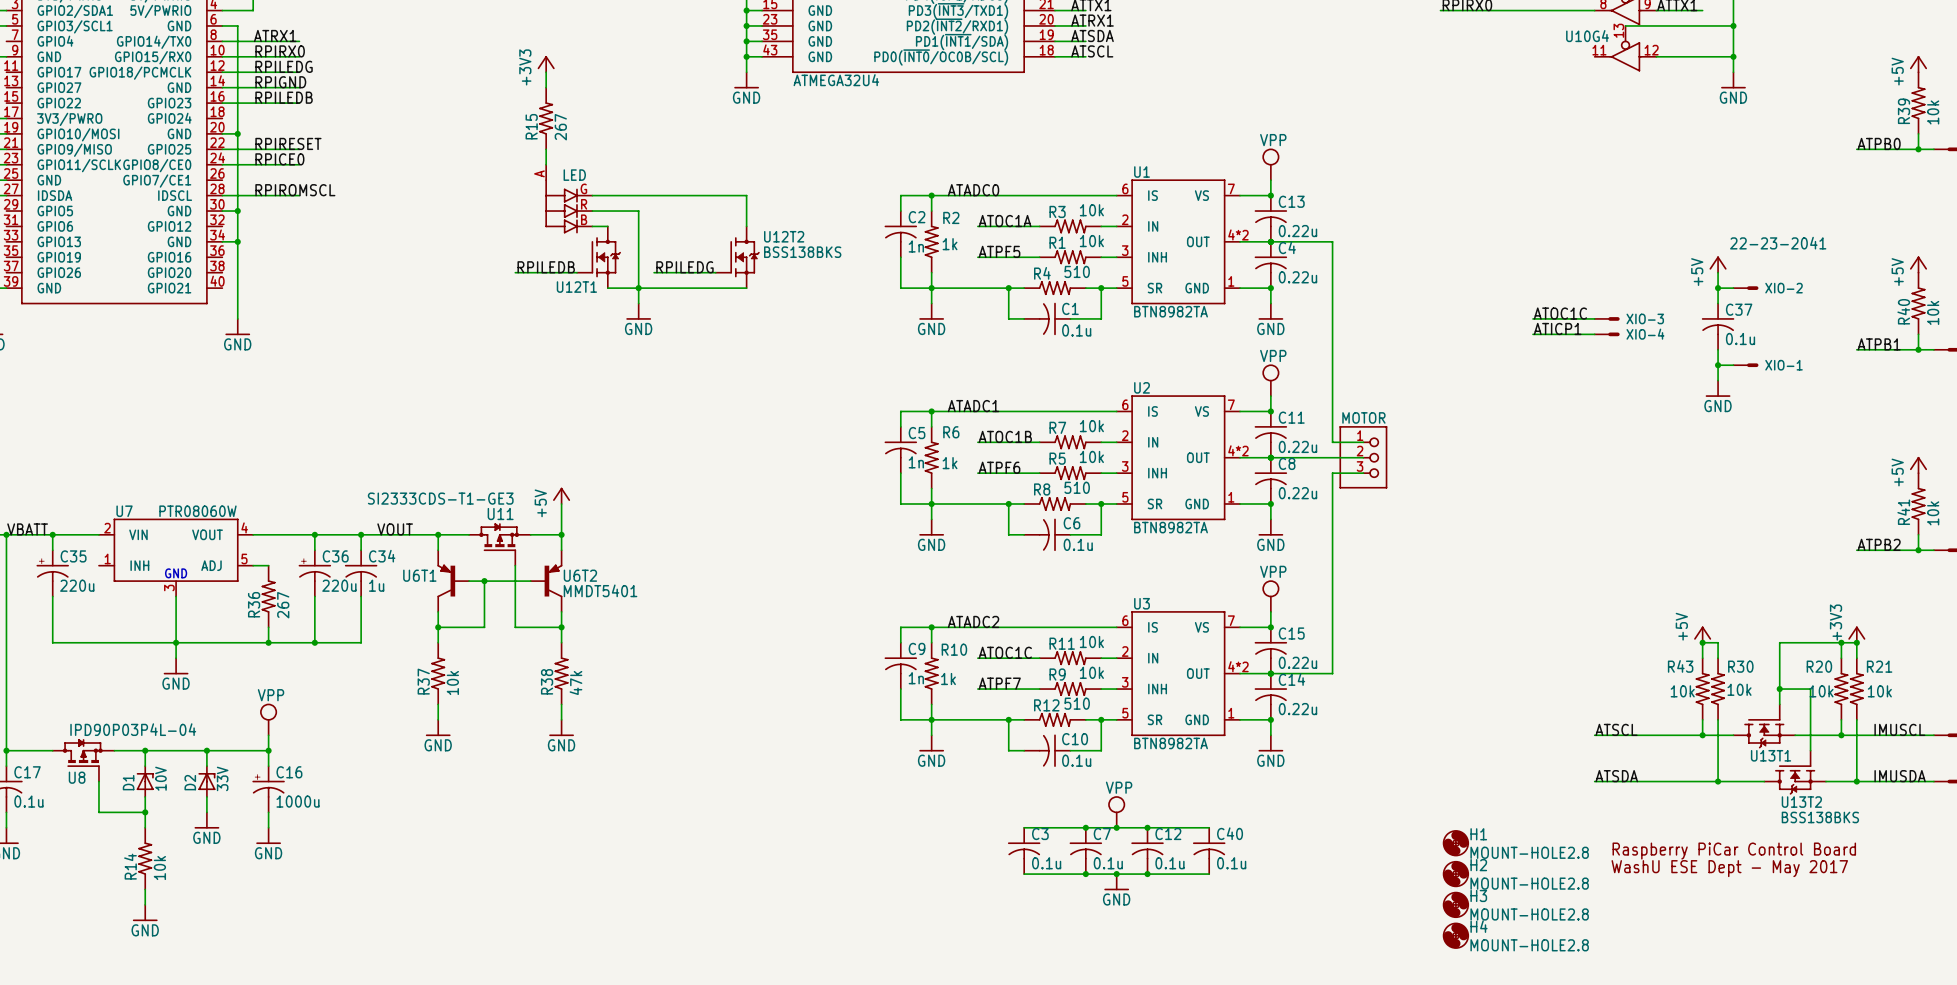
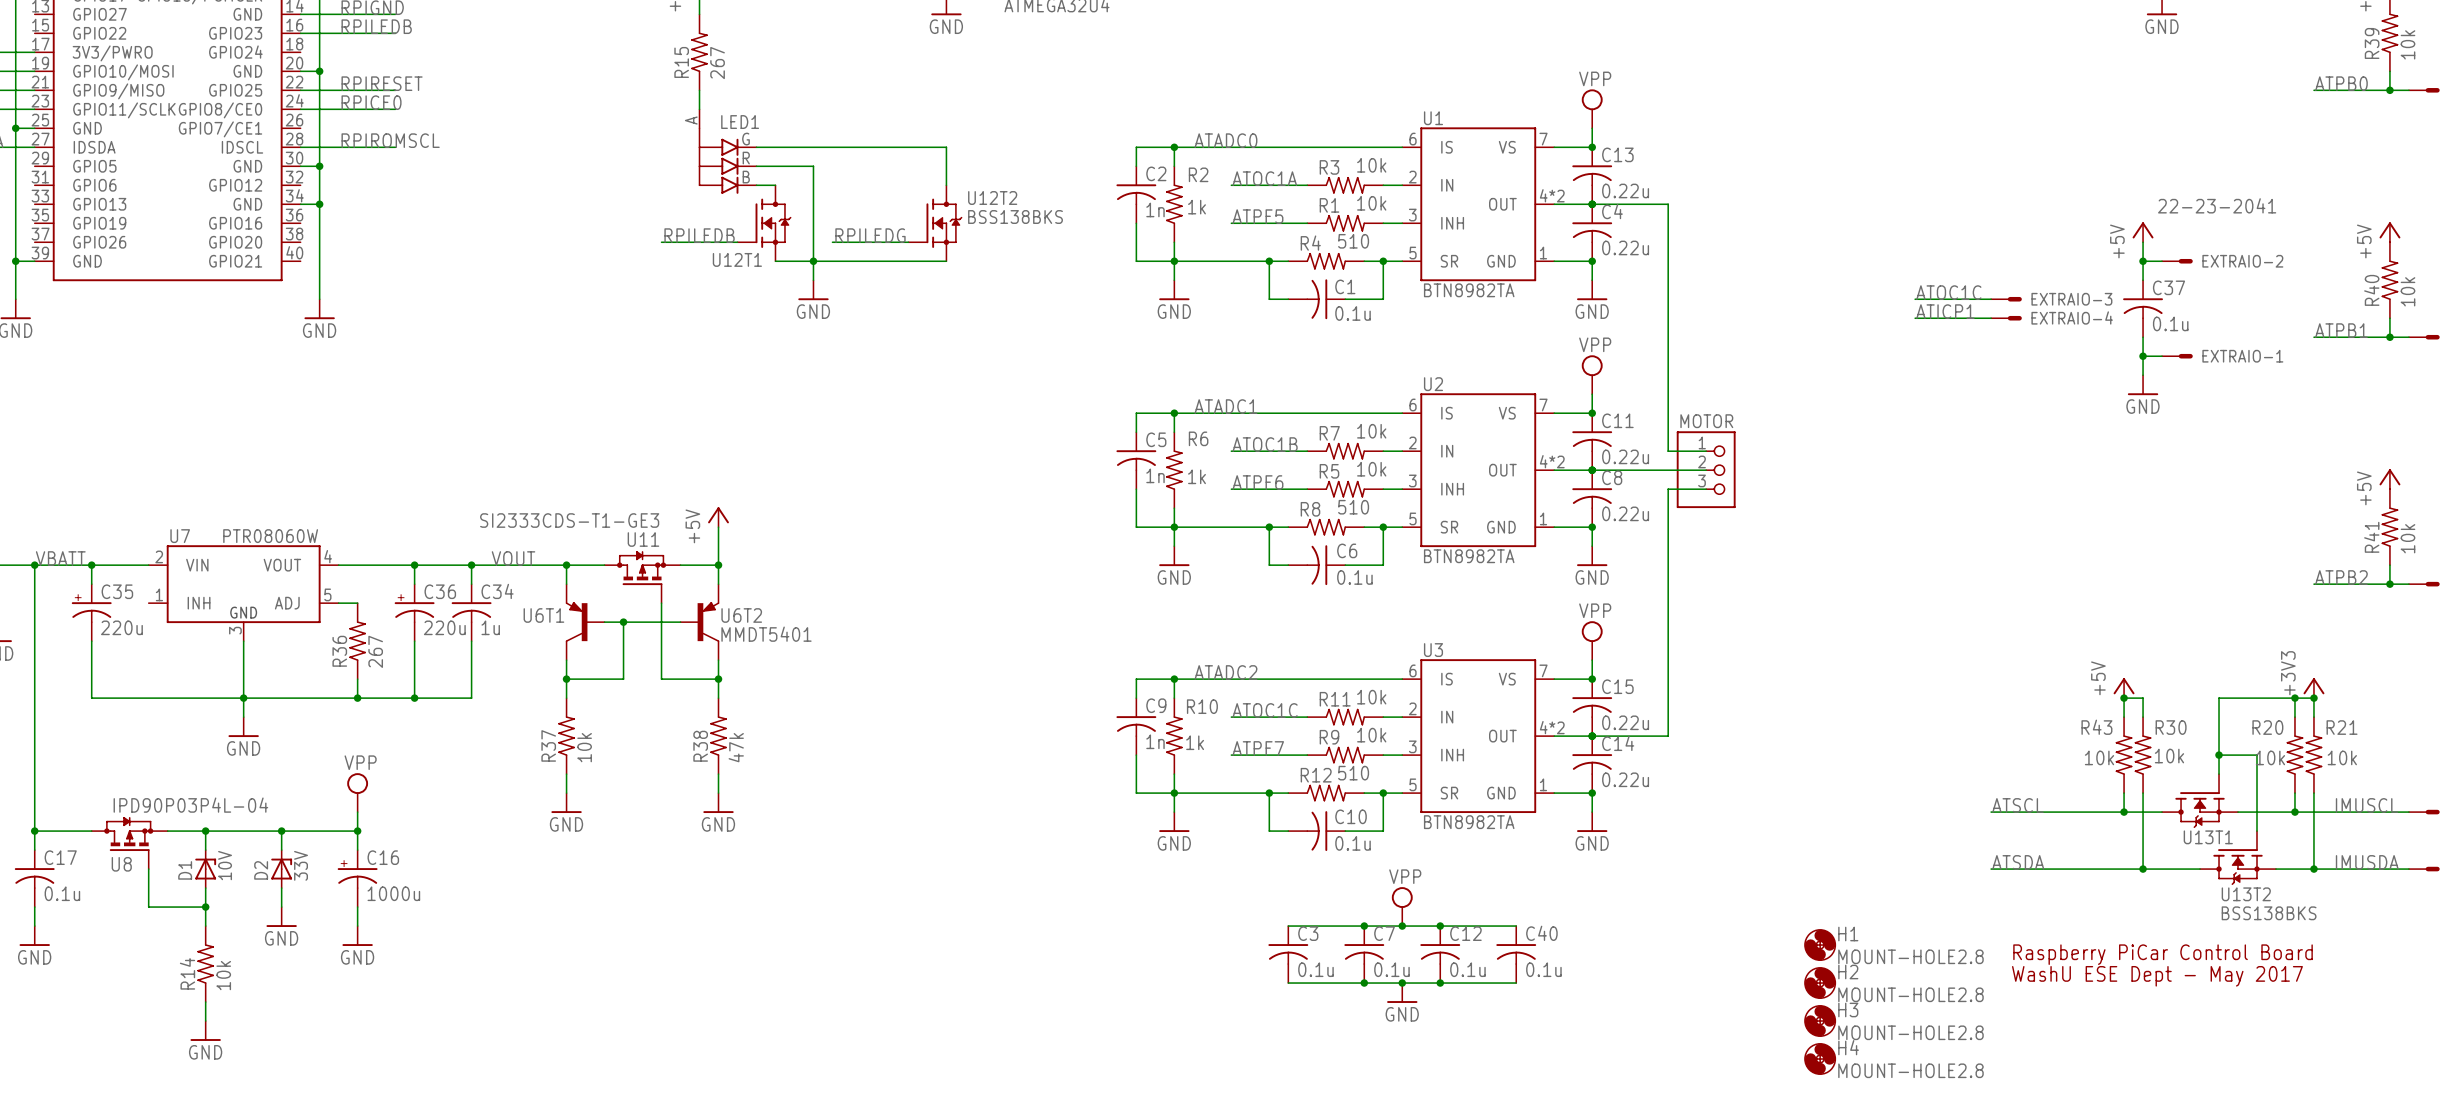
LED name: LED (574, 175) -> LED1 (740, 122)
XIO-2 name: XIO-2 (1784, 288) -> EXTRAIO-2 (2242, 261)
XIO-3 name: XIO-3 (1645, 318) -> EXTRAIO-3 (2071, 299)
XIO-4 name: XIO-4 (1645, 334) -> EXTRAIO-4 (2072, 317)
XIO-1 name: XIO-1 (1784, 365) -> EXTRAIO-1 (2242, 356)

